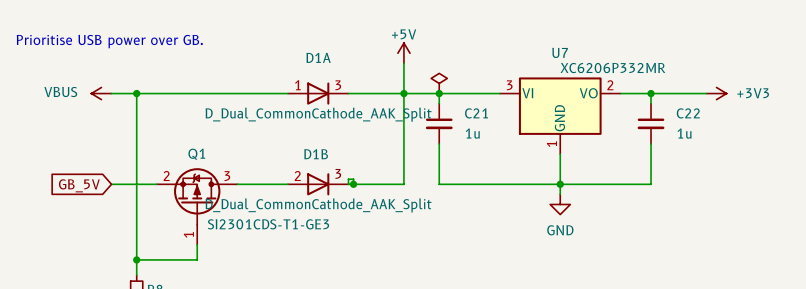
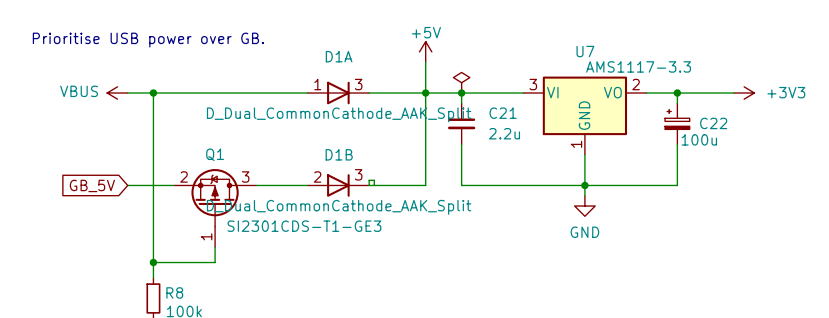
U7 value: XC6206P332MR (612, 68) -> AMS1117-3.3 (638, 66)
C22 symbol: [637, 103, 665, 144] -> [665, 103, 690, 145]
C21 value: 1u (472, 133) -> 2.2u (504, 133)
C22 value: 1u (684, 133) -> 100u (699, 139)
junction: (353, 184) -> none

